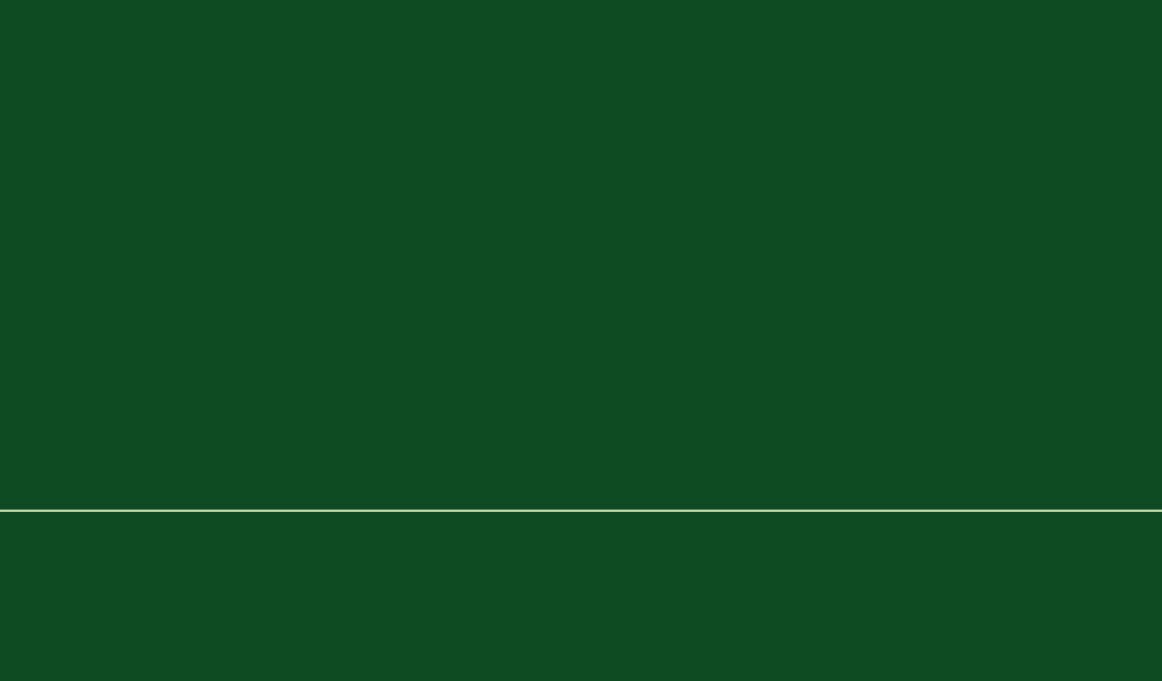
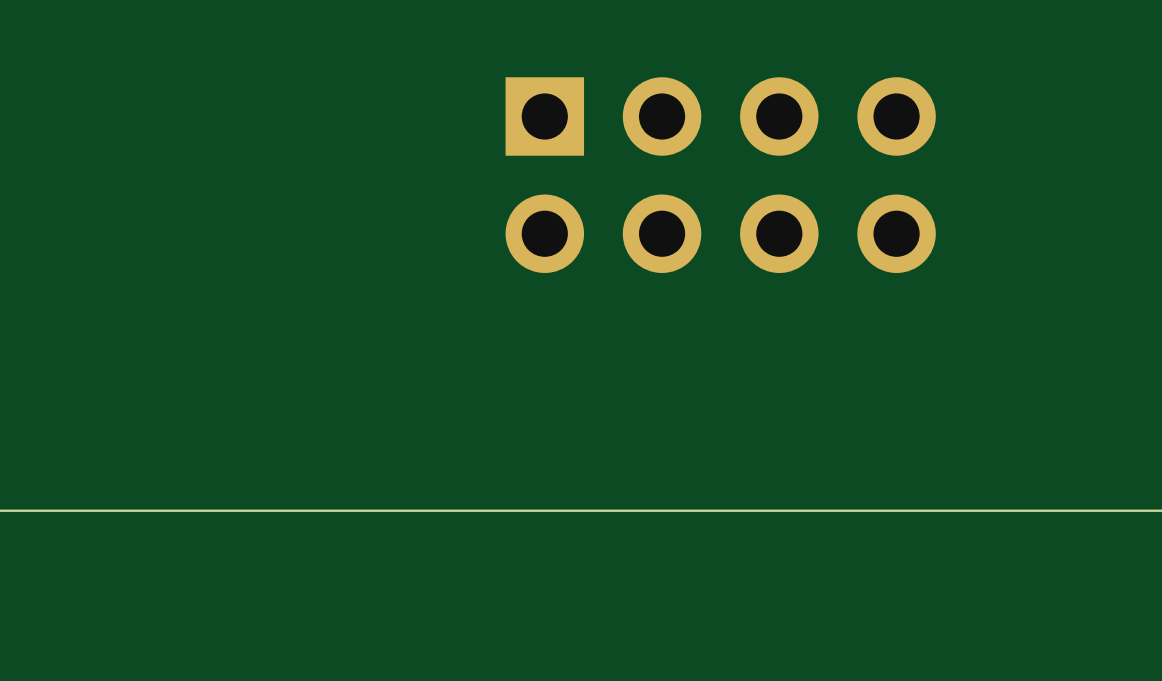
part: none -> (720, 175)

